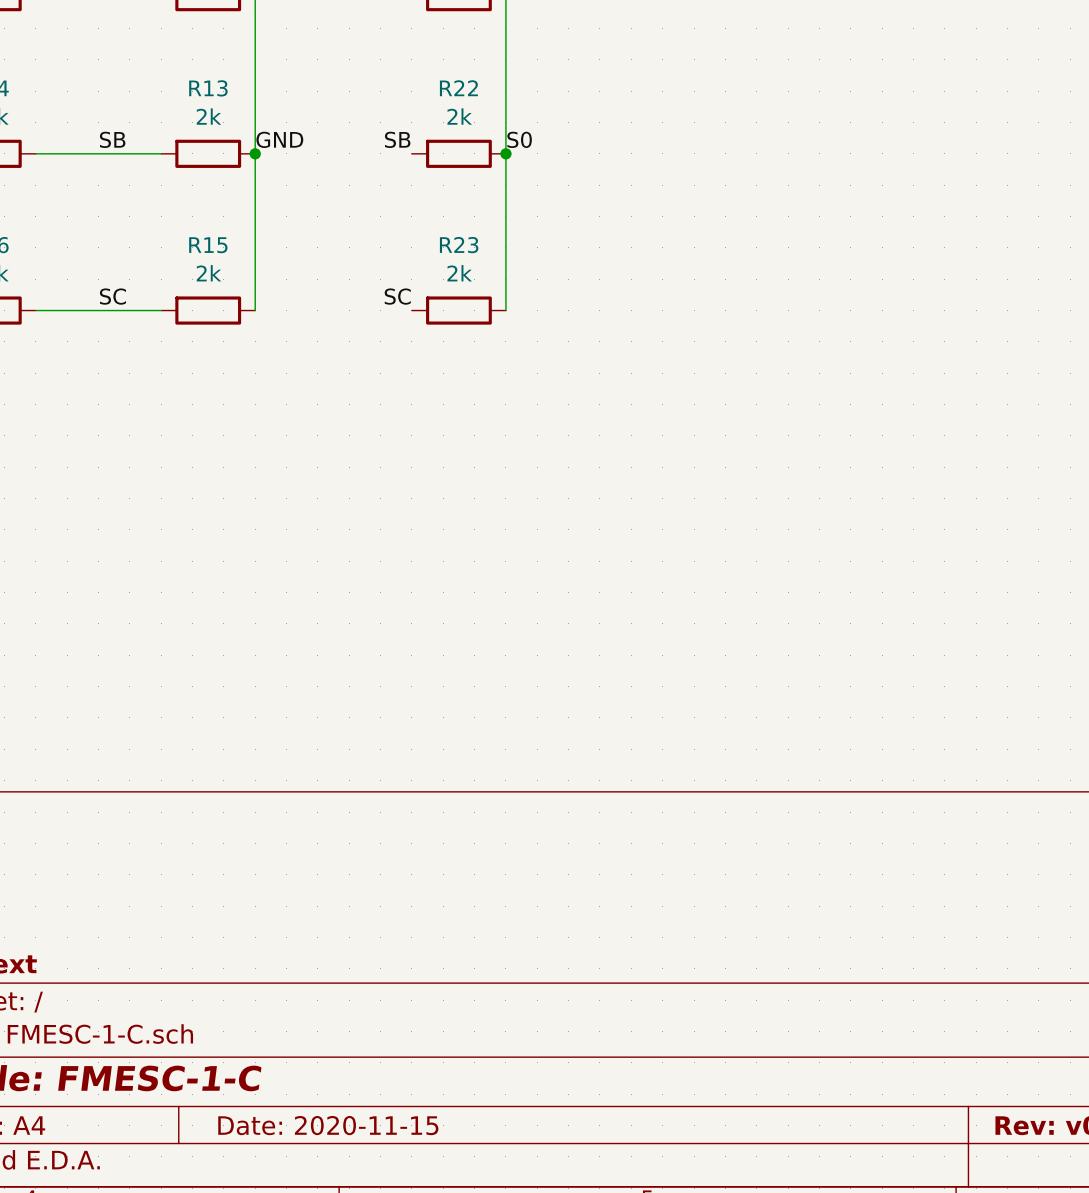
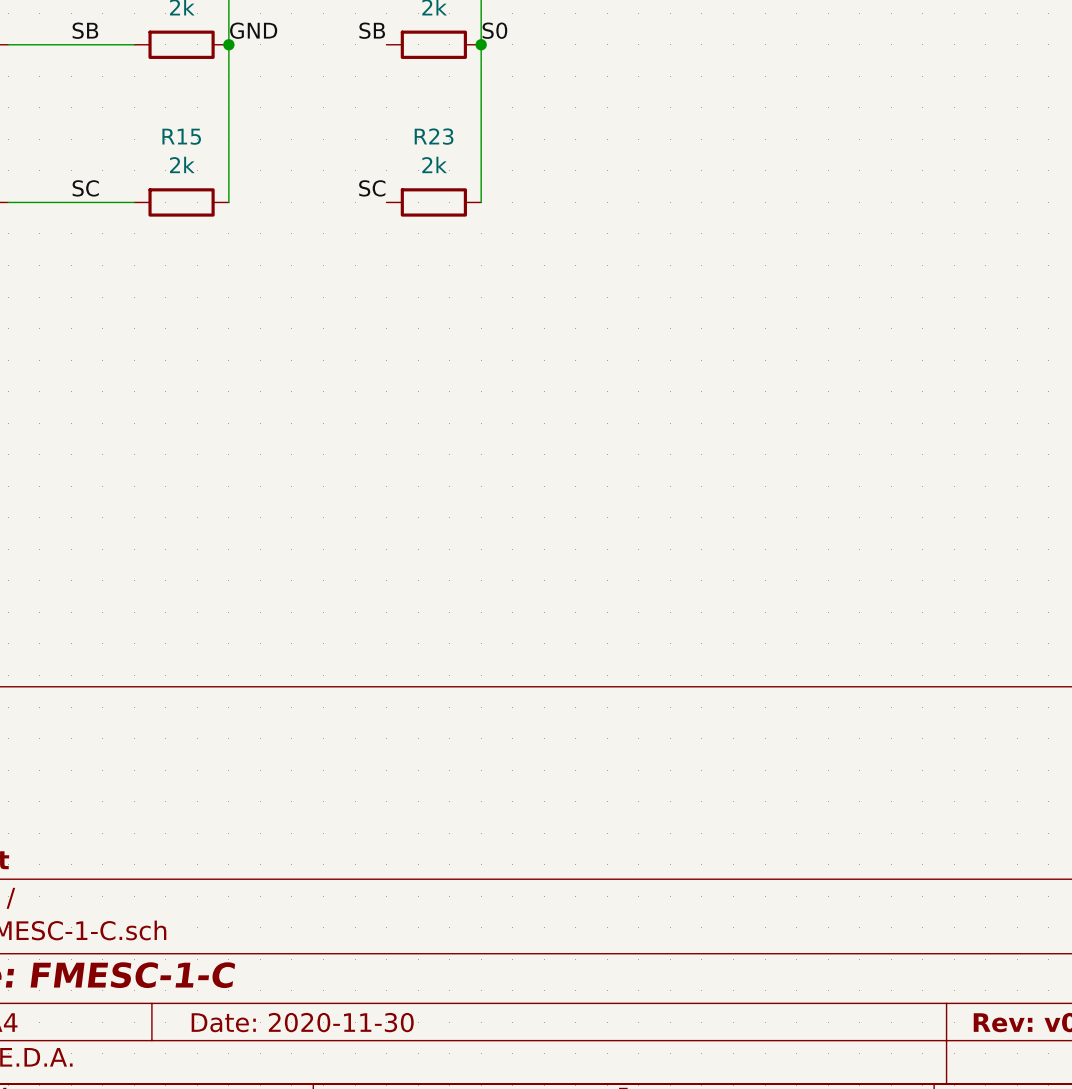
title block: Date: 2020-11-15 (328, 1125) -> Date: 2020-11-30 (302, 1022)

